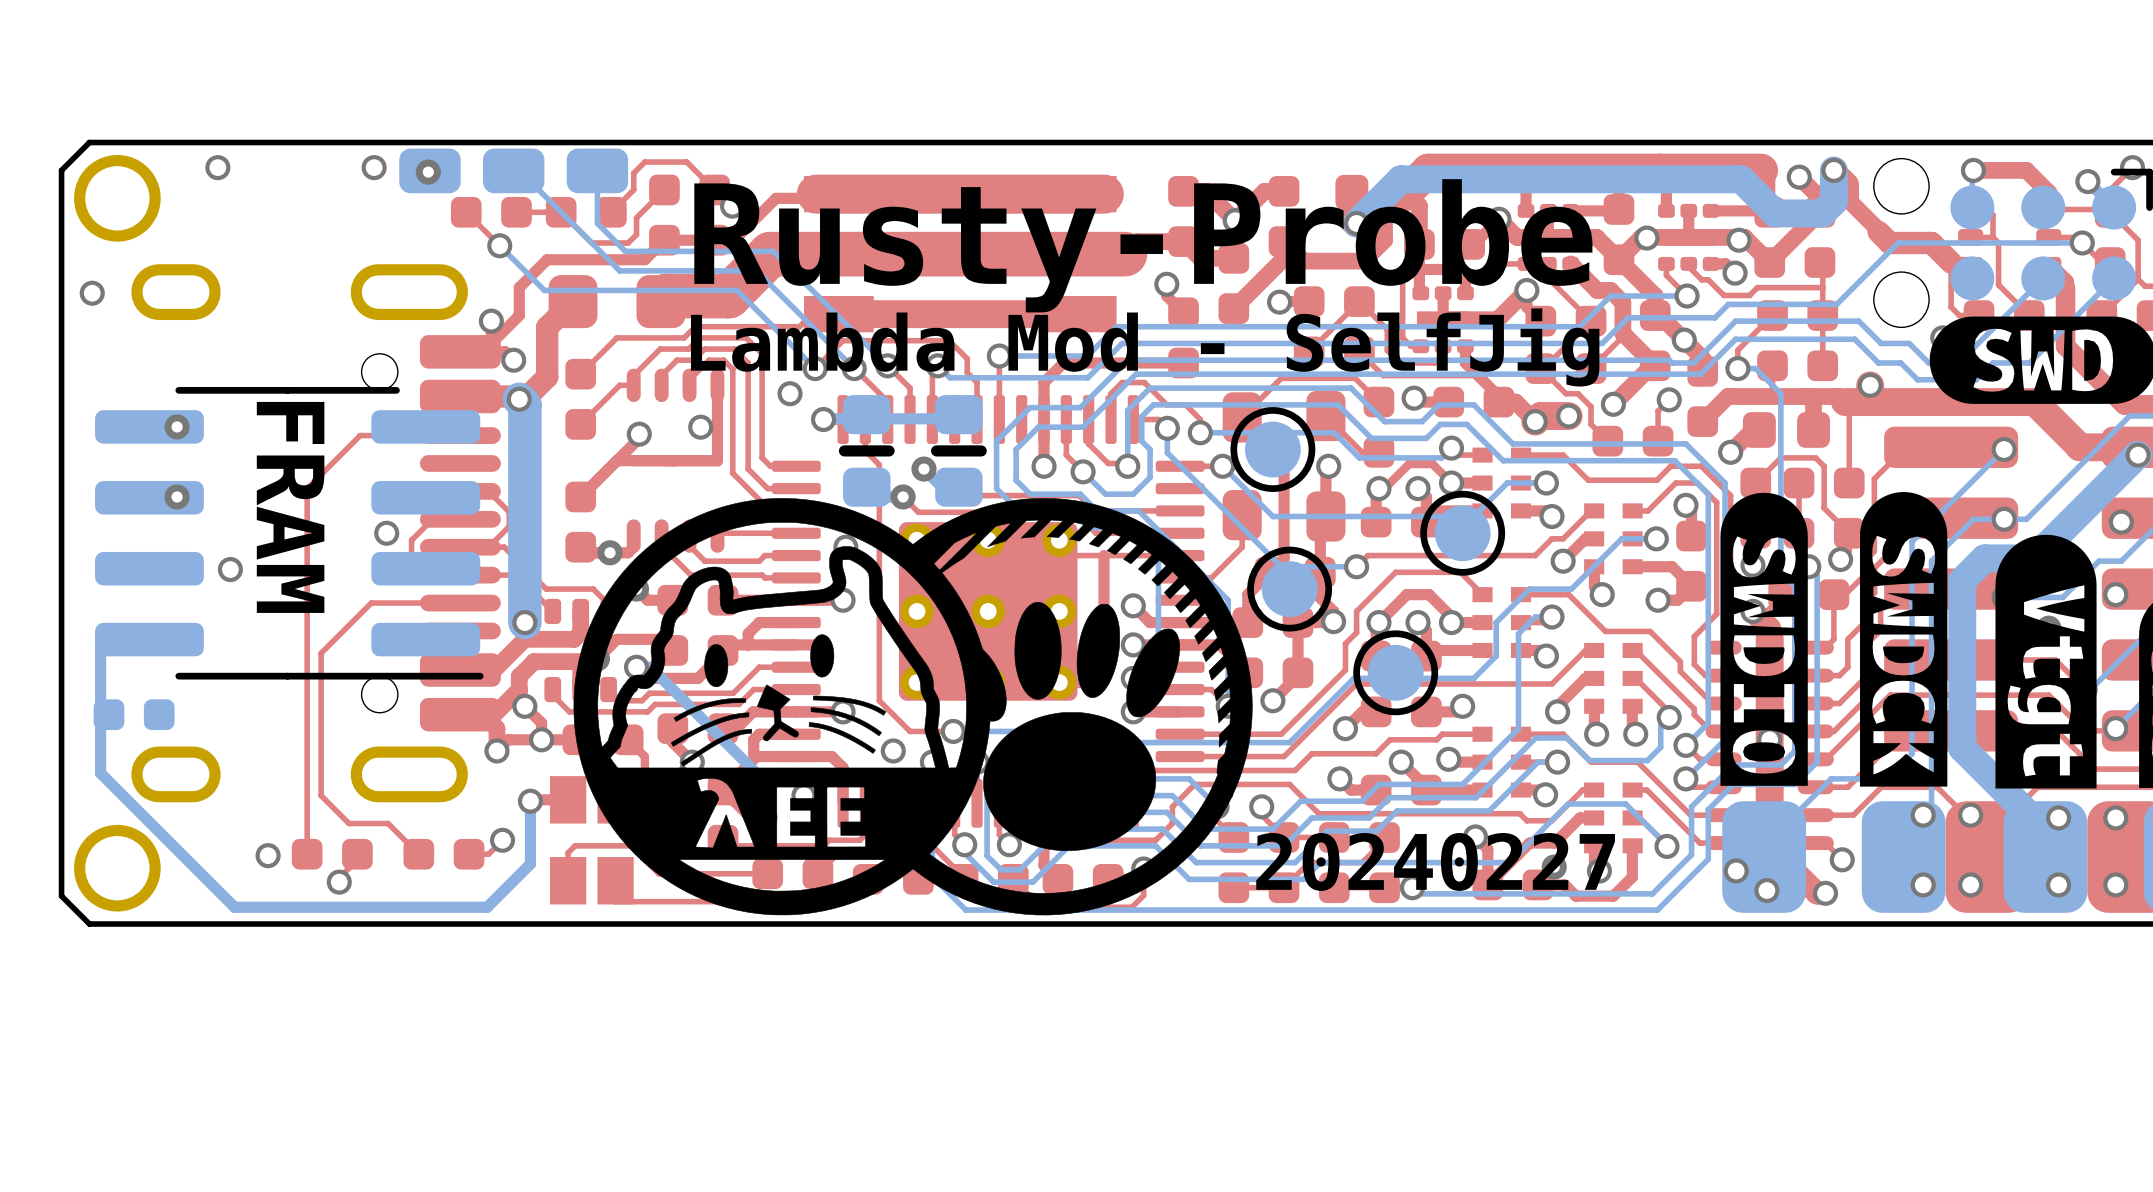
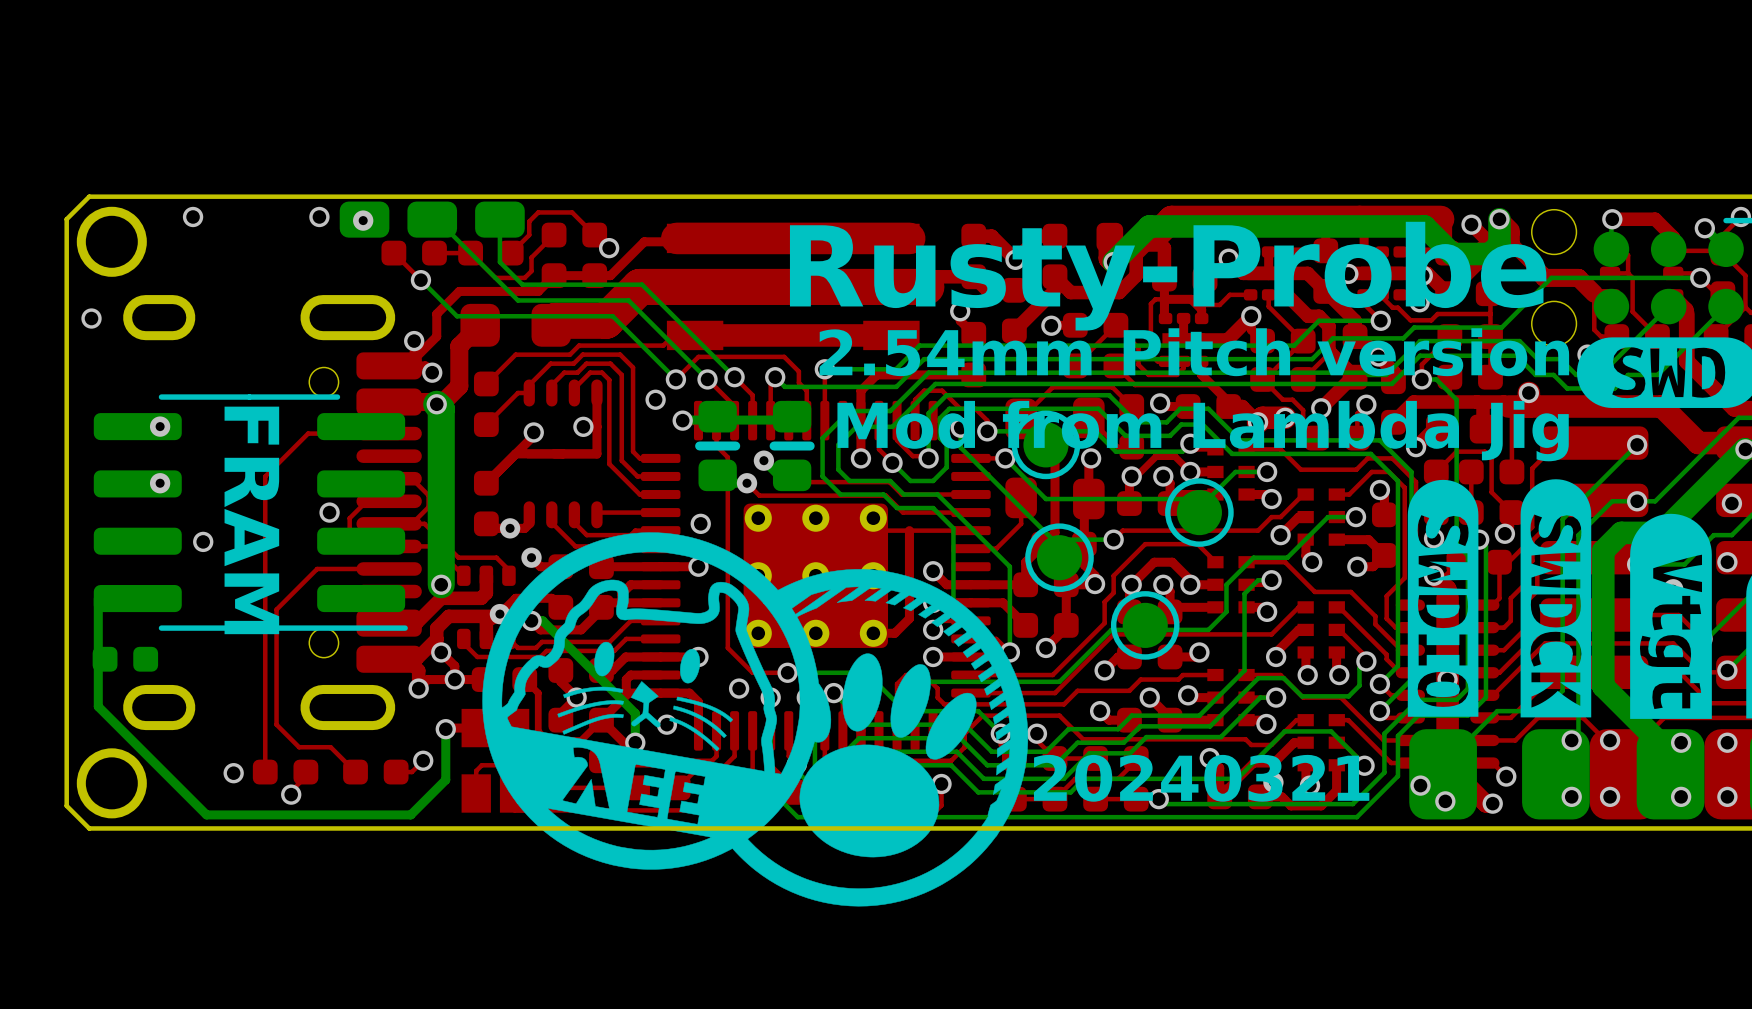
text position: Rusty-Probe (1143, 245) -> Rusty-Probe (1168, 276)
text: none -> 2.54mm Pitch version (1194, 352)
text: Lambda Mod - SelfJig (1145, 347) -> none
text: none -> Mod from Lambda Jig (1203, 431)
drawing: [573, 498, 1253, 916] -> none
drawing: none -> [482, 532, 1029, 907]
text: 20240227 (1435, 861) -> 20240321 (1201, 778)

